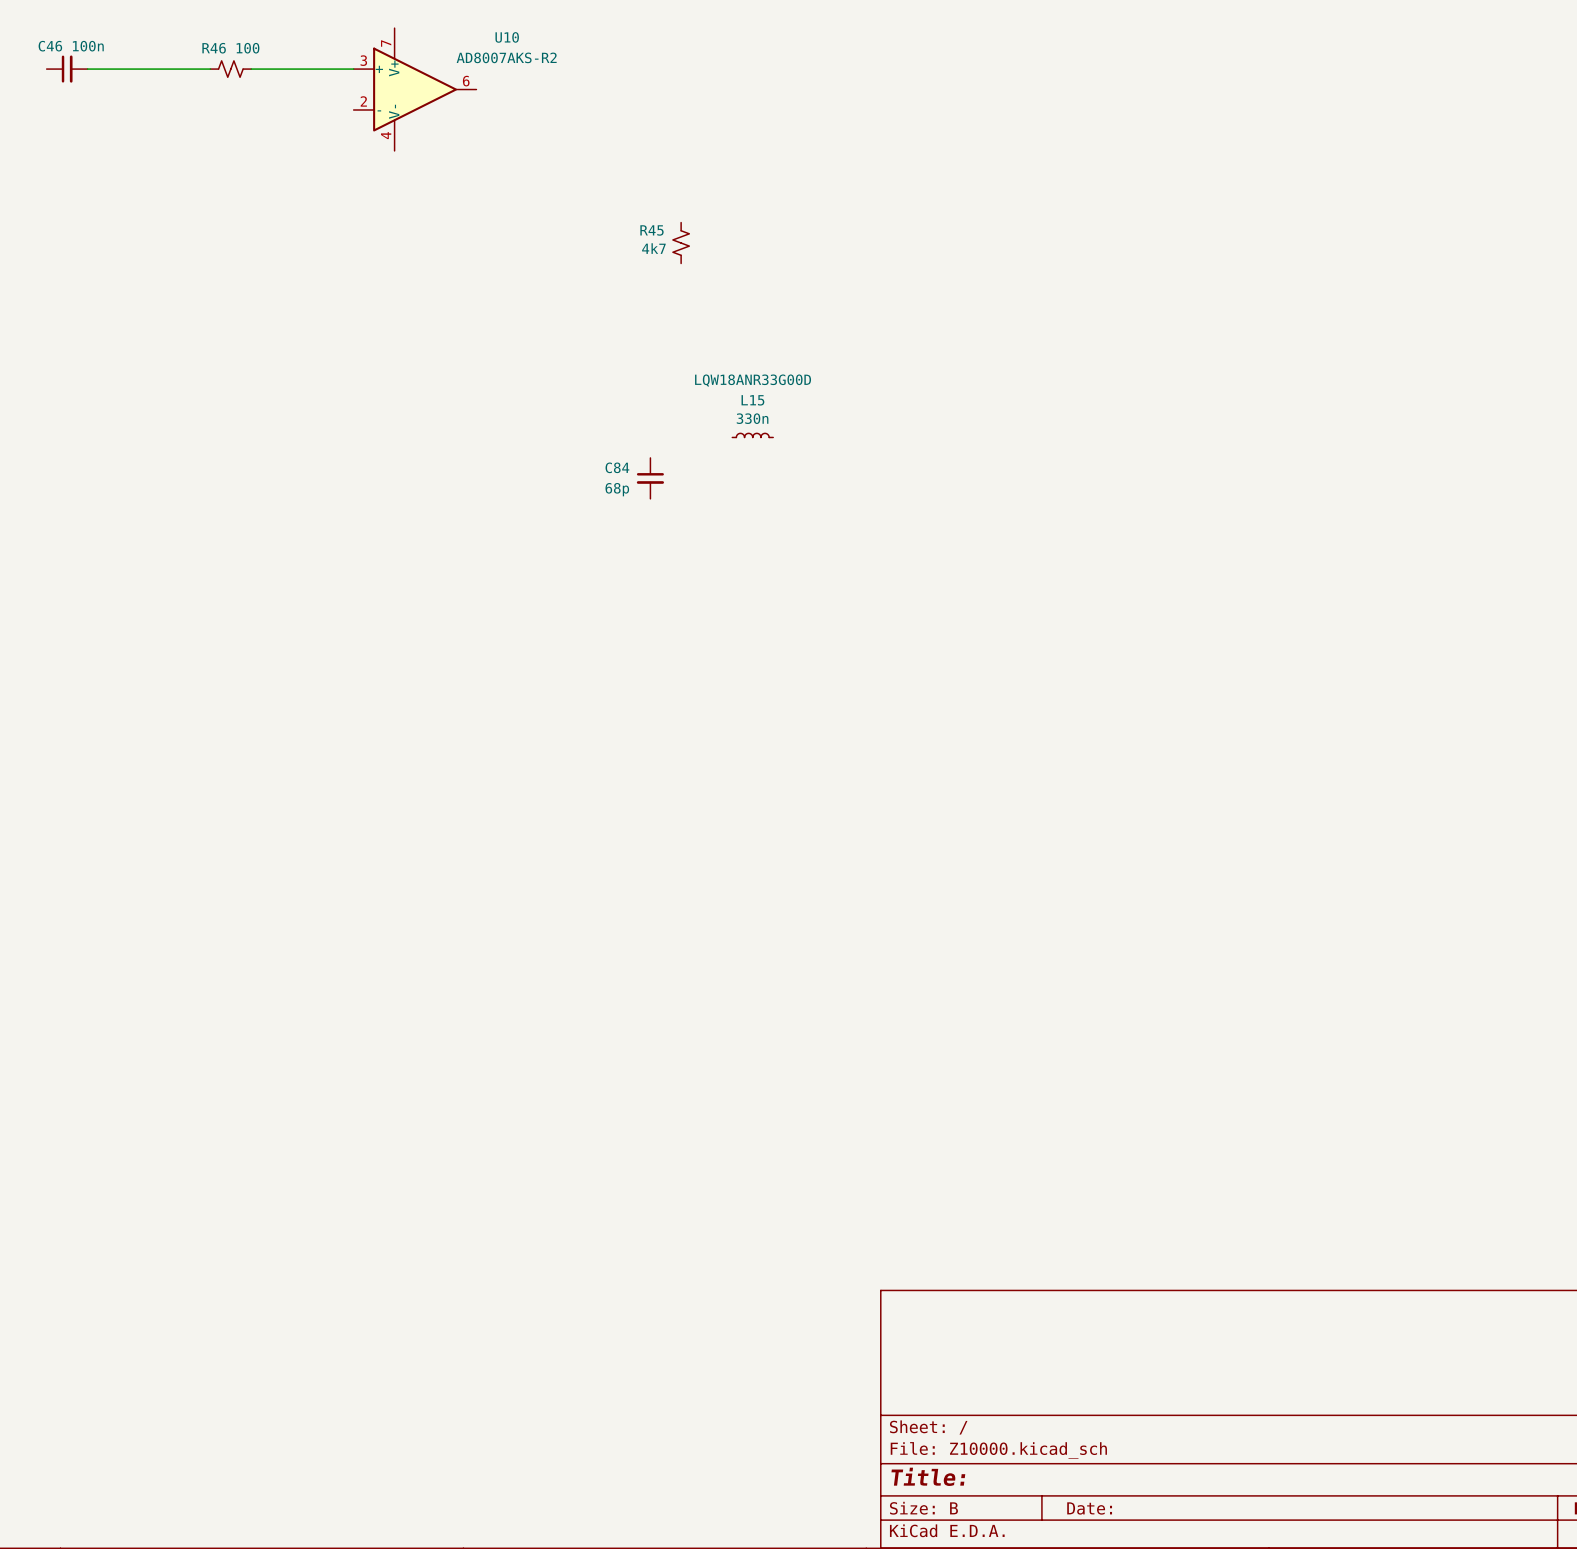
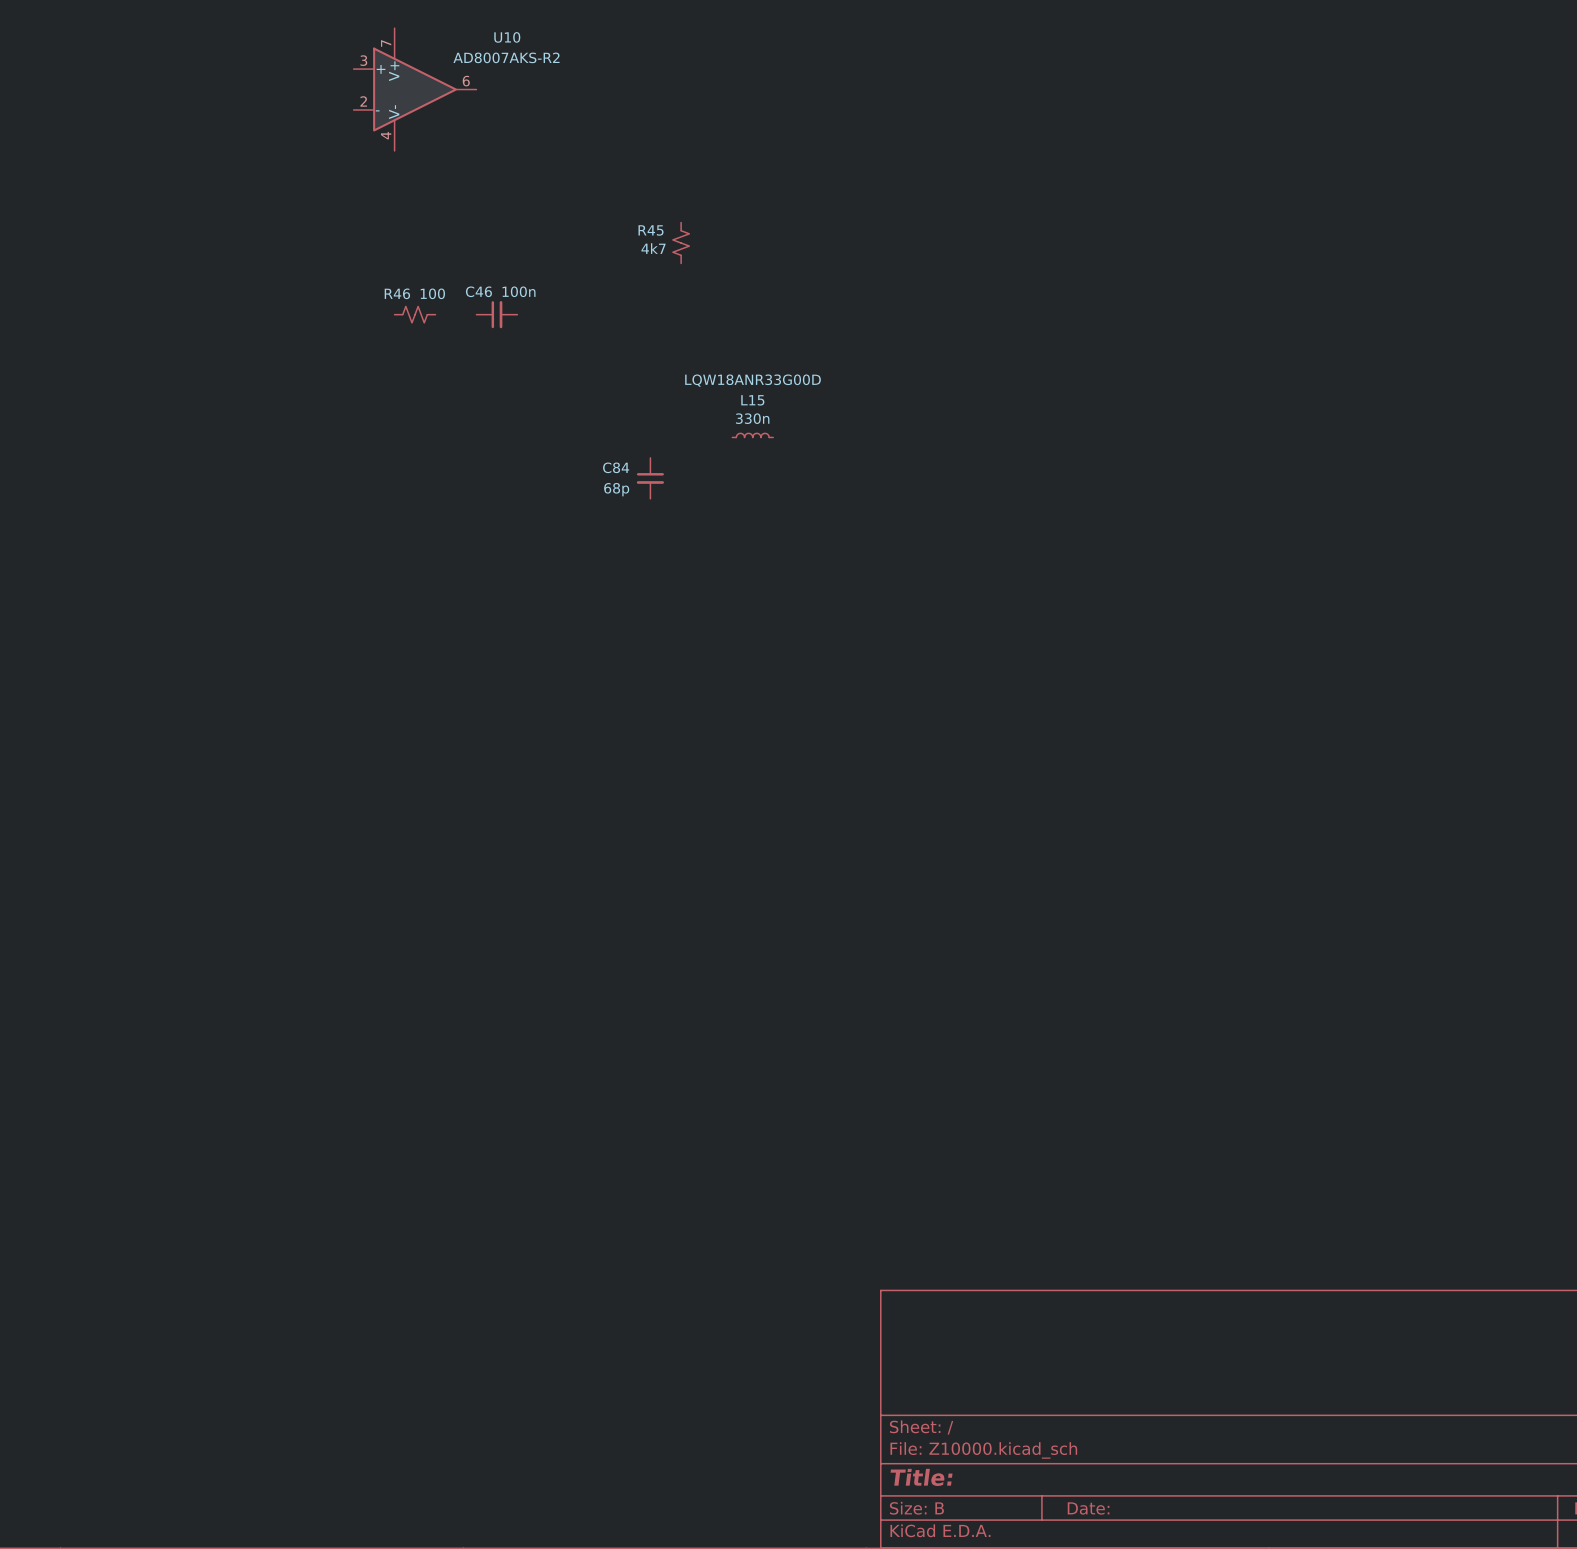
C46 position: (67, 69) -> (496, 314)
wire: (87, 69) (210, 69) -> none
R46 position: (230, 69) -> (415, 314)
wire: (251, 69) (353, 69) -> none

